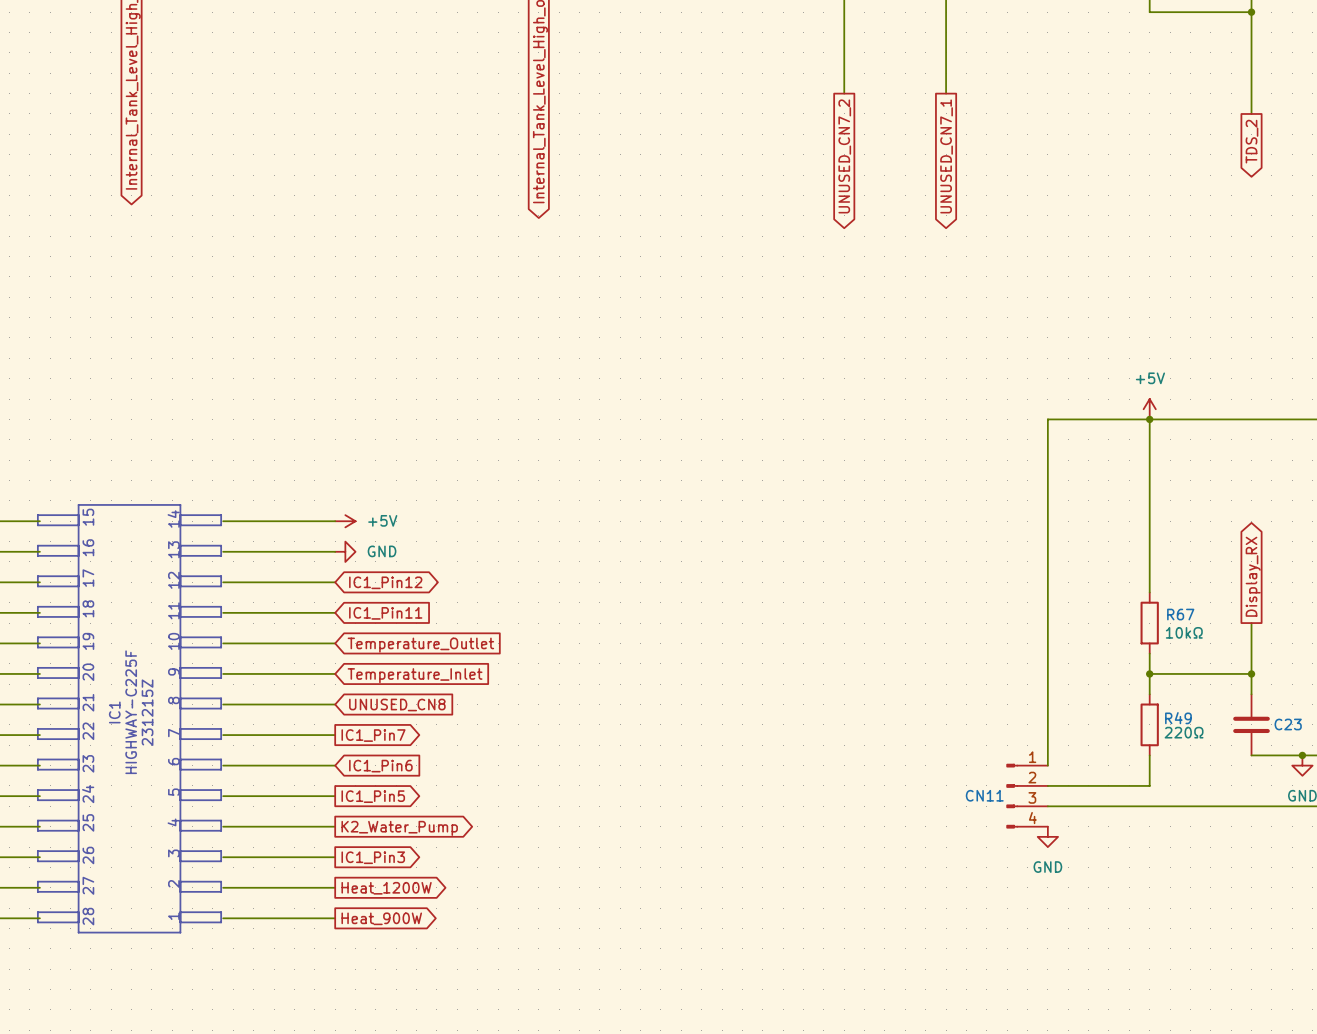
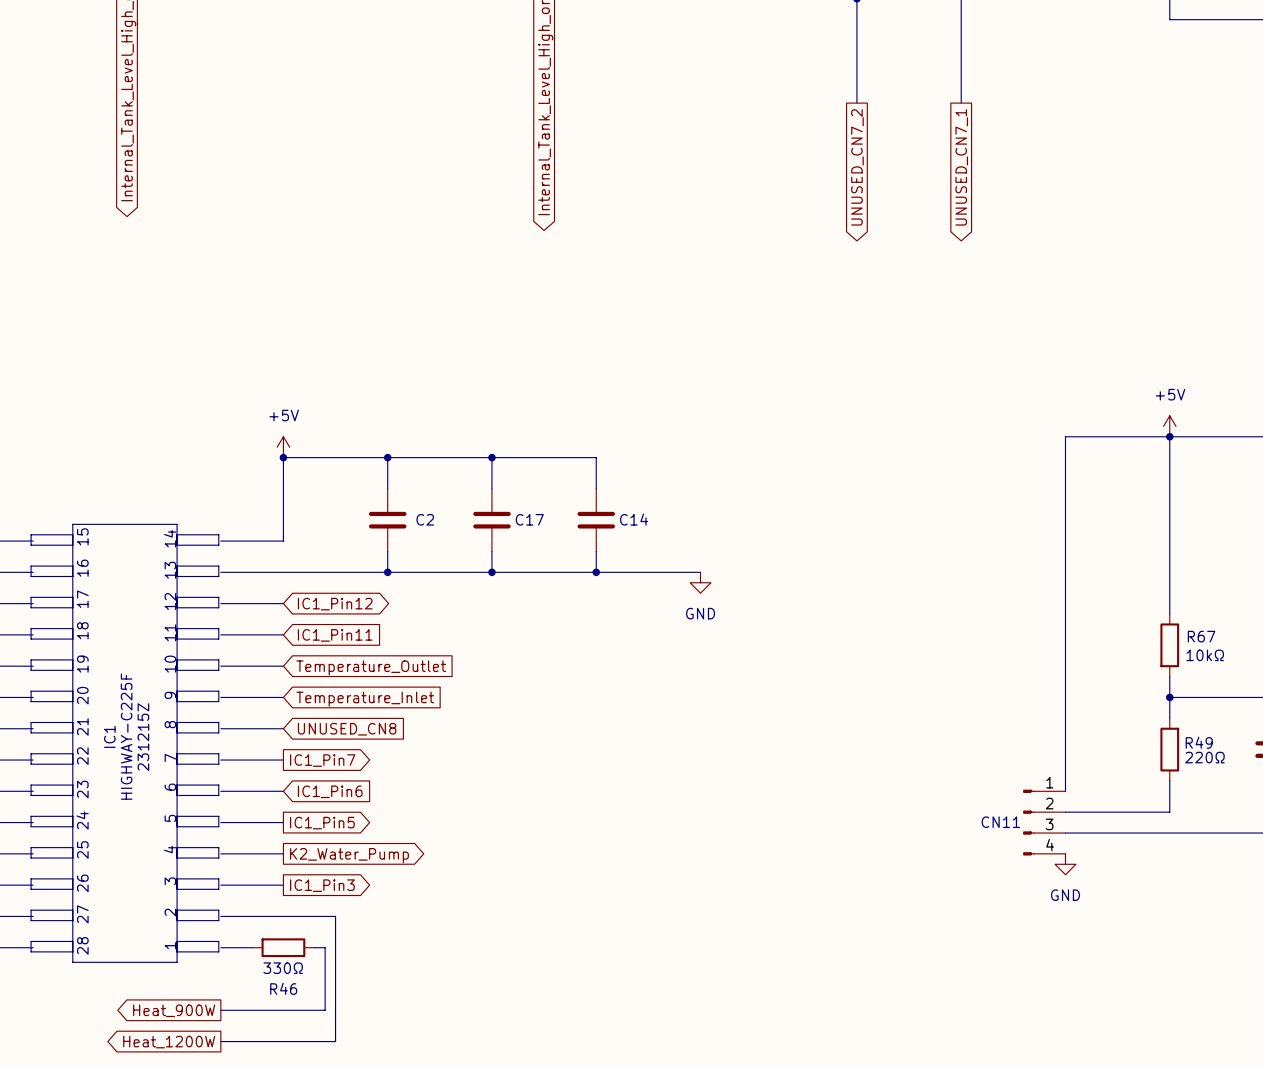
junction: none -> (283, 457)
wire: none -> (387, 457) (387, 488)
junction: none -> (387, 457)
wire: none -> (491, 457) (491, 488)
junction: none -> (491, 457)
C2: none -> (387, 520)
C17: none -> (491, 520)
C14: none -> (596, 520)
wire: (284, 521) (335, 521) -> (283, 541) (283, 457) (596, 457) (596, 488)
power symbol rotation: 0° (345, 521) -> 90° counterclockwise (283, 447)
power symbol position: +5V (345, 521) -> +5V (283, 447)
wire: none -> (387, 551) (387, 572)
wire: none -> (491, 551) (491, 572)
wire: none -> (596, 551) (596, 572)
wire: none -> (335, 572) (700, 572)
power symbol: GND (345, 551) -> none
junction: none -> (387, 572)
junction: none -> (491, 572)
junction: none -> (596, 572)
power symbol: none -> GND (700, 582)
wire: (284, 582) (335, 582) -> none
global label position: IC1_Pin12 (385, 582) -> IC1_Pin12 (335, 604)
wire: (284, 612) (335, 612) -> none
global label position: IC1_Pin11 (385, 613) -> IC1_Pin11 (335, 635)
wire: (284, 643) (335, 643) -> none
global label position: Temperature_Outlet (420, 645) -> Temperature_Outlet (371, 667)
wire: (284, 673) (335, 673) -> none
global label position: Temperature_Inlet (415, 675) -> Temperature_Inlet (365, 699)
wire: (284, 704) (335, 704) -> none
global label position: UNUSED_CN8 (397, 705) -> UNUSED_CN8 (347, 729)
wire: (284, 735) (335, 735) -> none
global label position: IC1_Pin7 (373, 735) -> IC1_Pin7 (322, 760)
wire: (284, 765) (335, 765) -> none
global label position: IC1_Pin6 (380, 766) -> IC1_Pin6 (330, 791)
wire: (284, 796) (335, 796) -> none
global label position: IC1_Pin5 (373, 796) -> IC1_Pin5 (322, 823)
wire: (284, 826) (335, 826) -> none
global label position: K2_Water_Pump (399, 828) -> K2_Water_Pump (349, 855)
wire: (284, 857) (335, 857) -> none
global label position: IC1_Pin3 (373, 857) -> IC1_Pin3 (322, 885)
wire: none -> (335, 916) (335, 1041) (220, 1041)
global label rotation: 0° (386, 888) -> 180° (169, 1042)
global label position: Heat_1200W (386, 888) -> Heat_1200W (169, 1042)
wire: (253, 918) (314, 918) -> none
R46: none -> 330Ω (283, 947)
wire: (324, 918) (335, 918) -> (325, 947) (325, 1010) (220, 1010)
global label rotation: 0° (381, 918) -> 180° (174, 1010)
global label position: Heat_900W (381, 918) -> Heat_900W (174, 1010)

